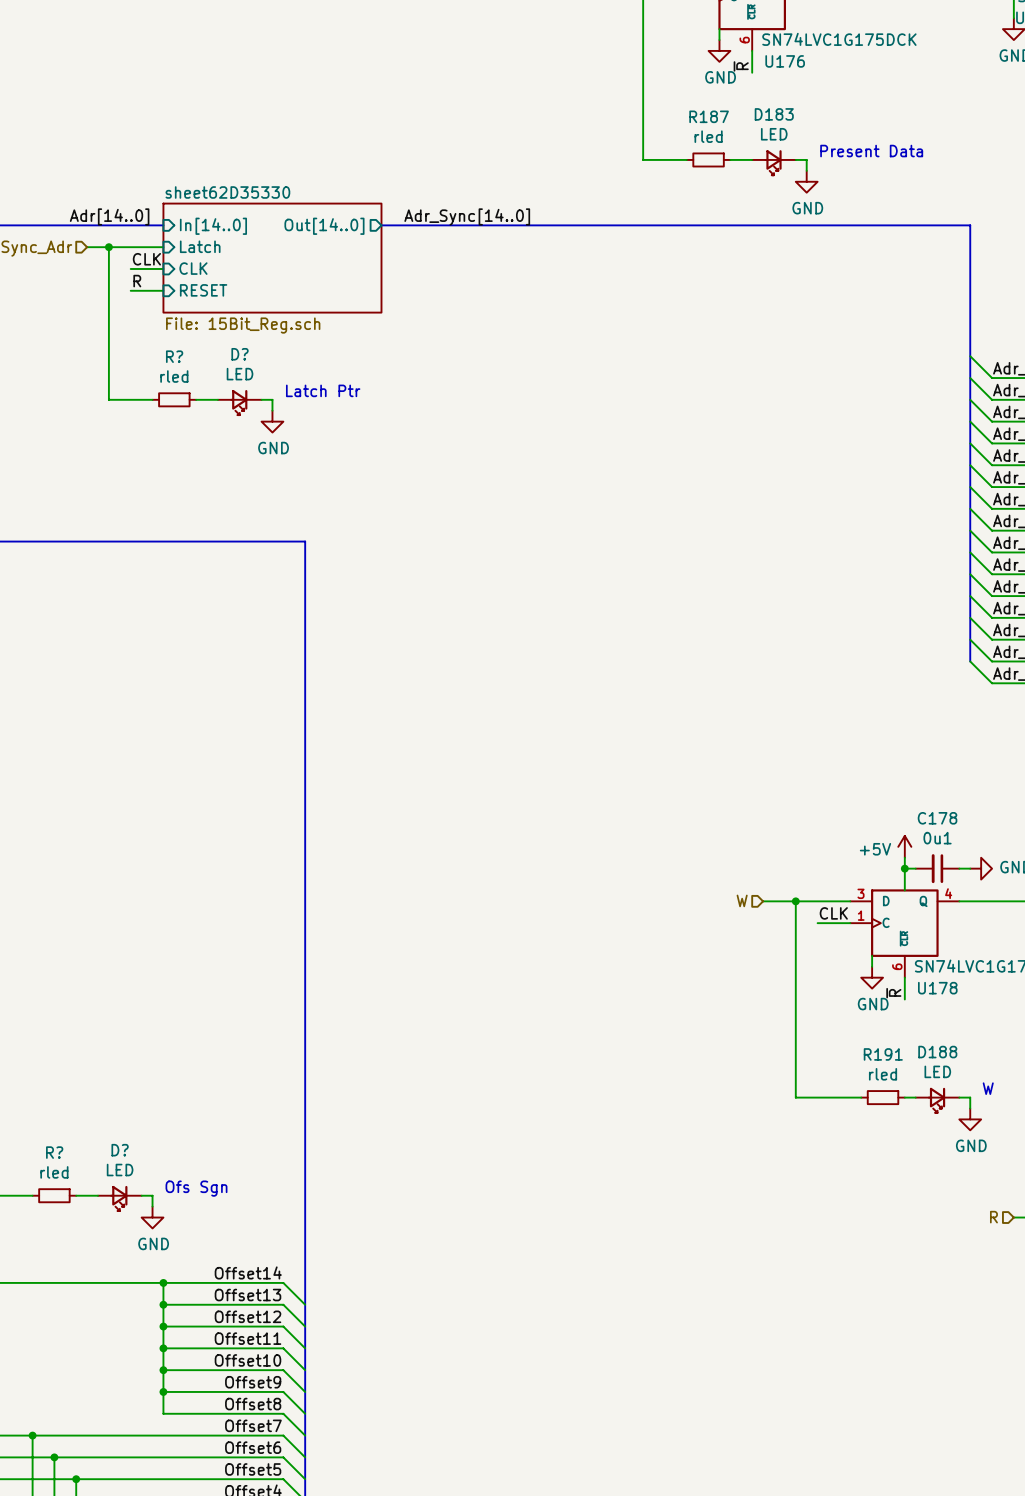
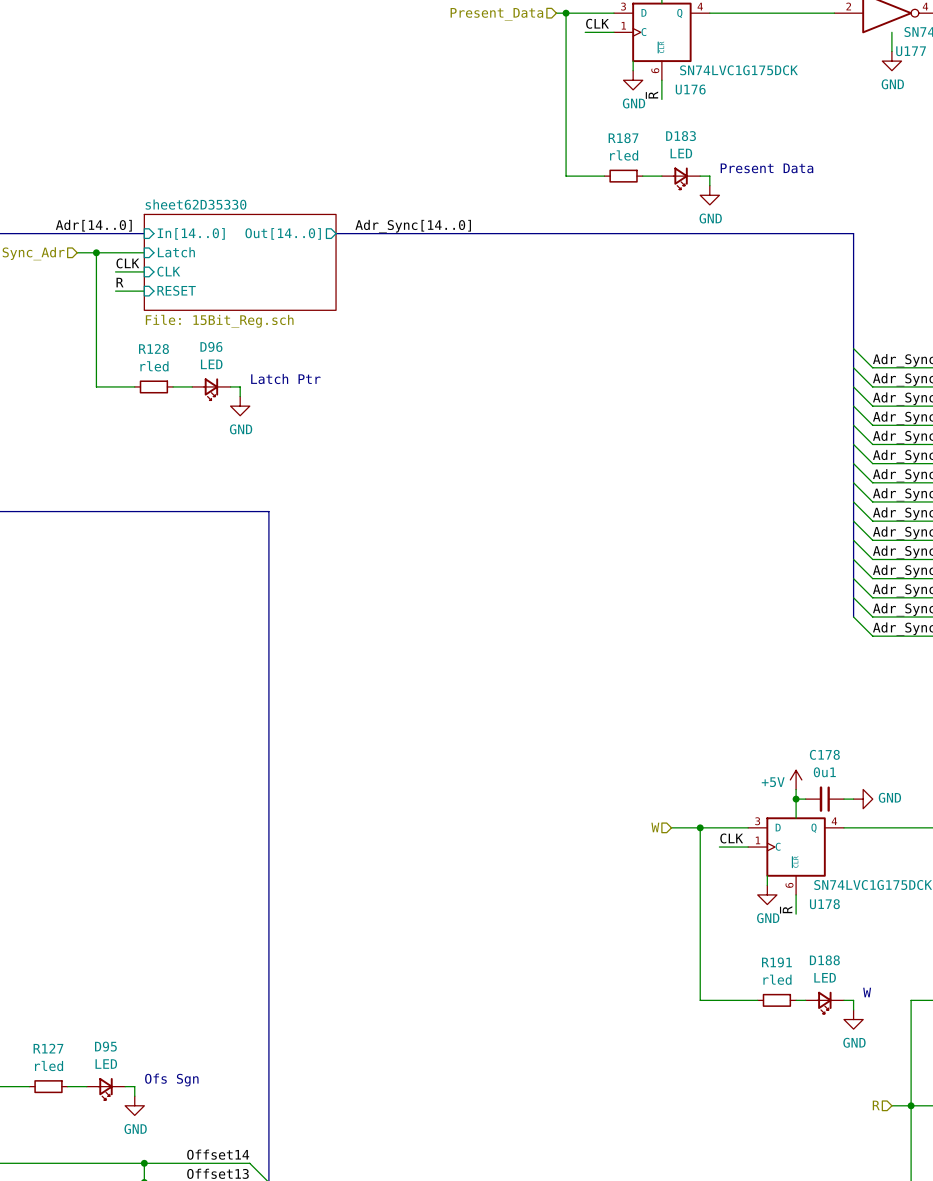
D? name: D? (240, 354) -> D96 (211, 346)
R? name: R? (174, 356) -> R128 (153, 349)
D? name: D? (120, 1150) -> D95 (105, 1046)
R? name: R? (54, 1152) -> R127 (48, 1048)

